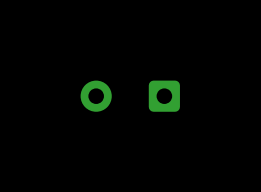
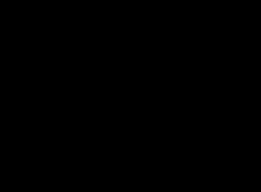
part: (130, 96) -> none

